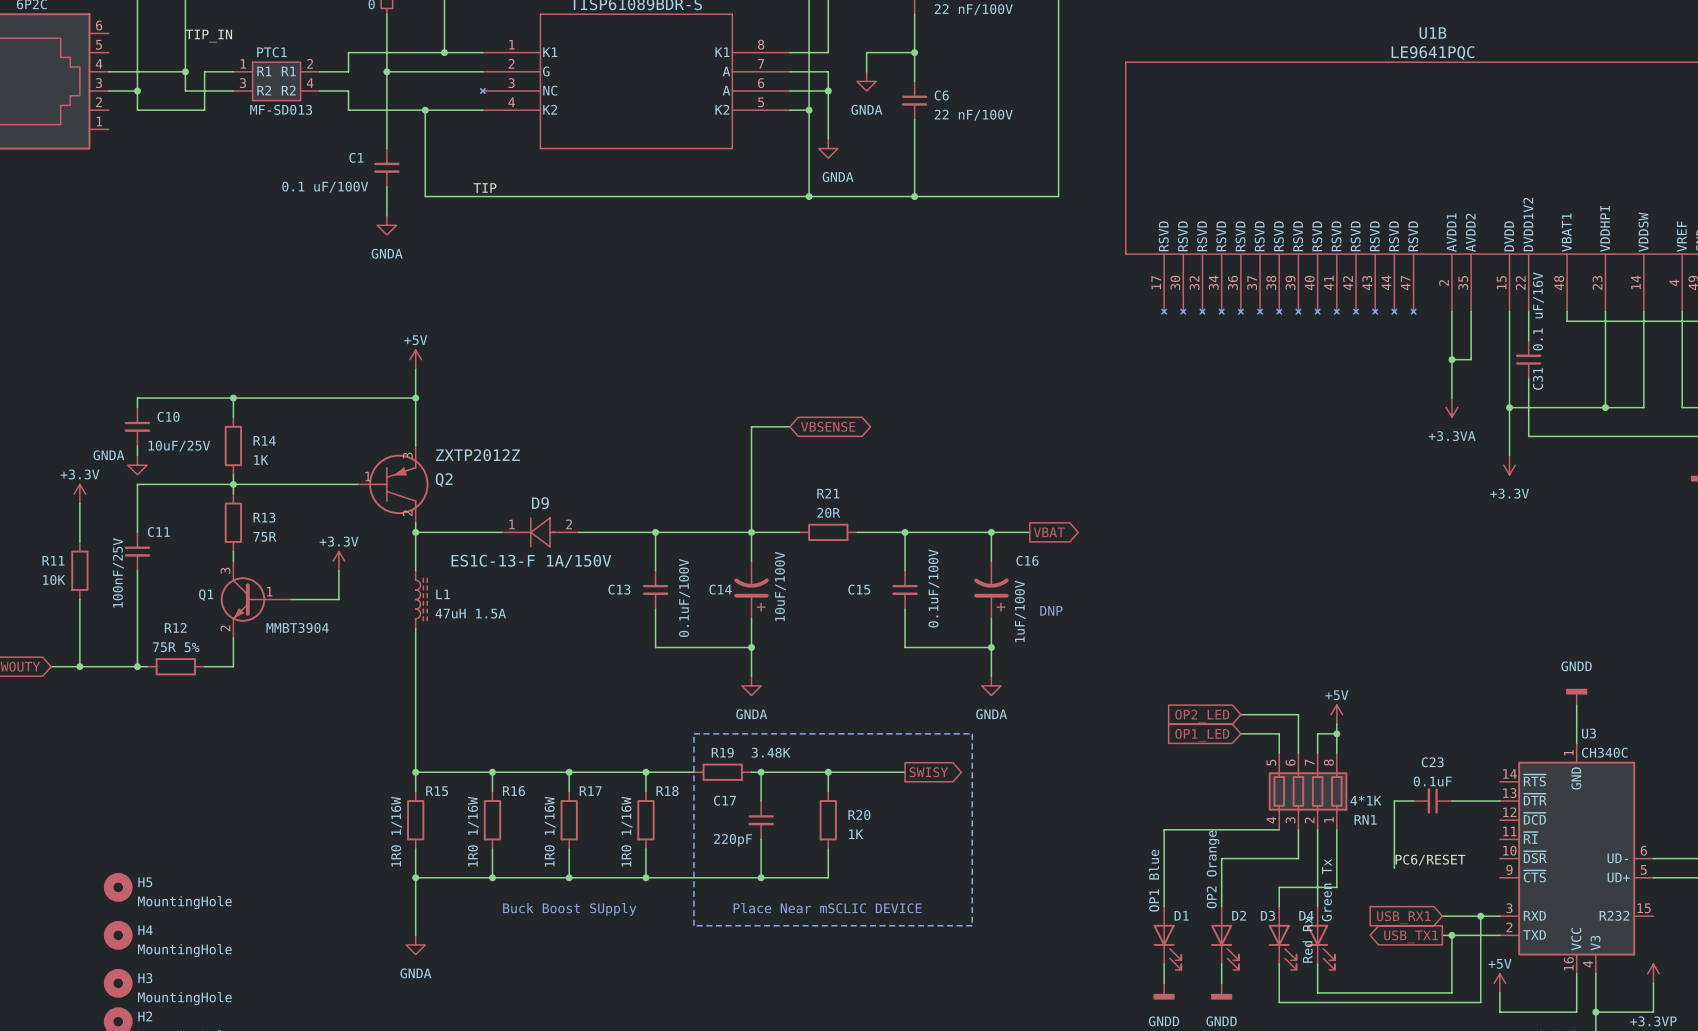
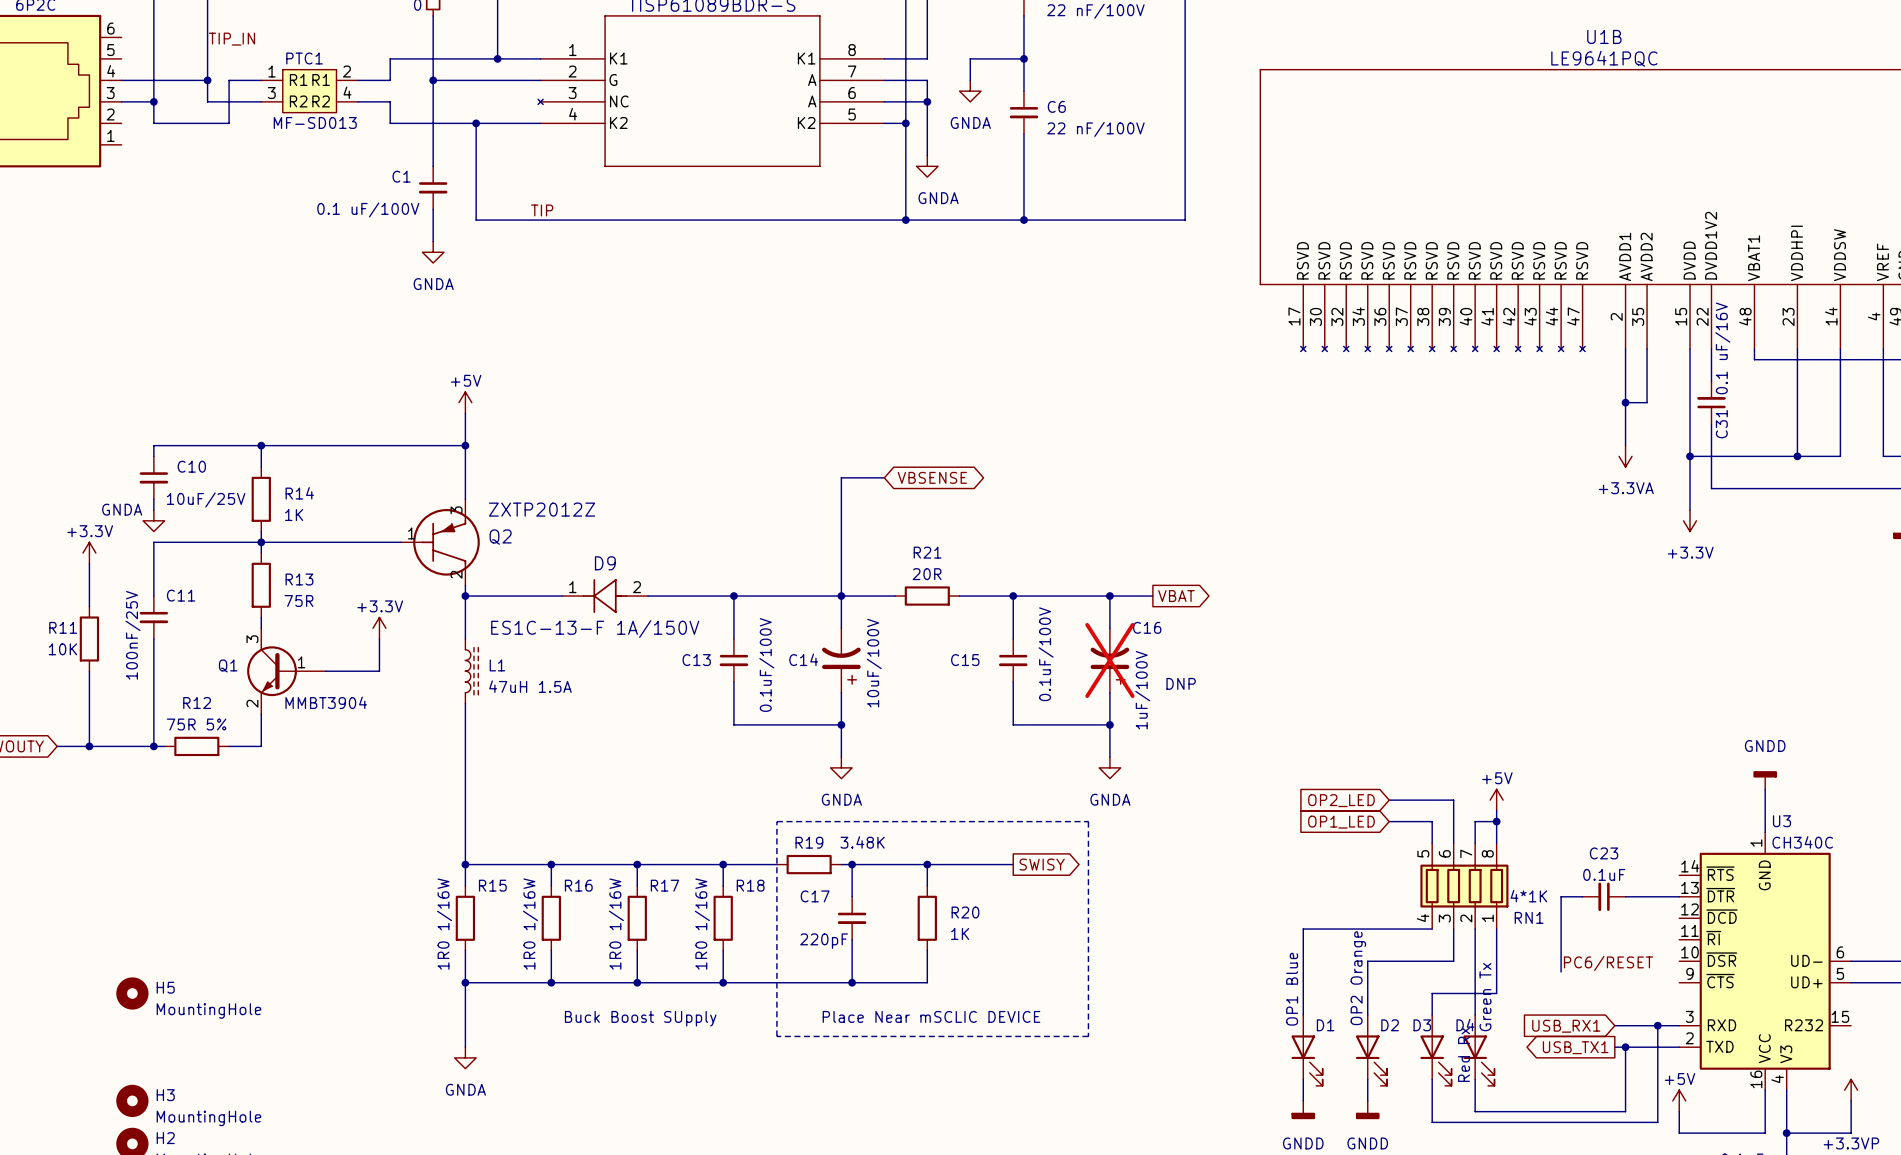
C16 do-not-place cross: none -> (1109, 660)
H4: MountingHole (118, 935) -> none

